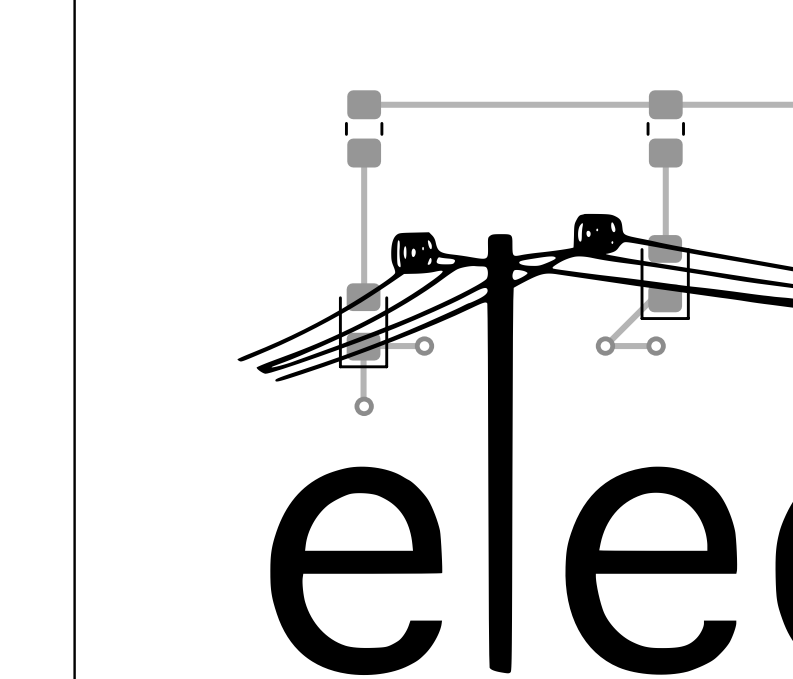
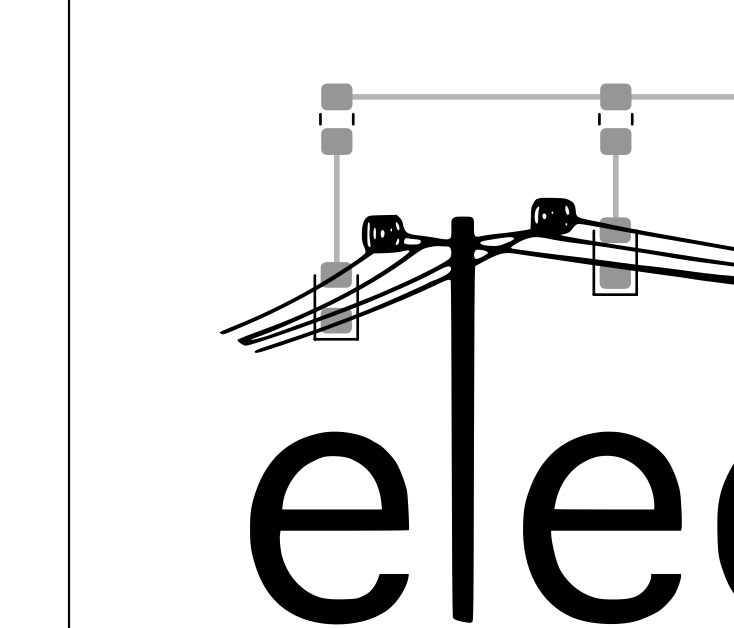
track: (653, 298) (605, 346) (656, 346) -> none
track: (363, 346) (364, 406) -> none
track: (364, 346) (424, 346) -> none
via: (424, 346) -> none
via: (605, 346) -> none
via: (656, 346) -> none
via: (364, 406) -> none

